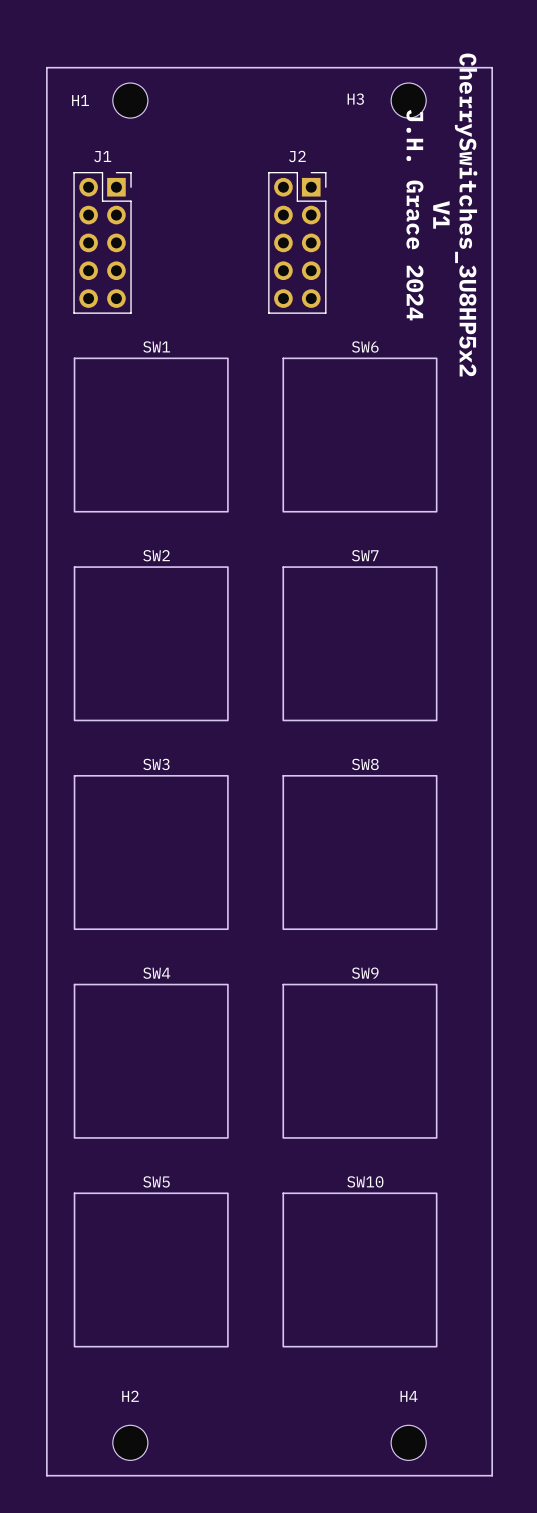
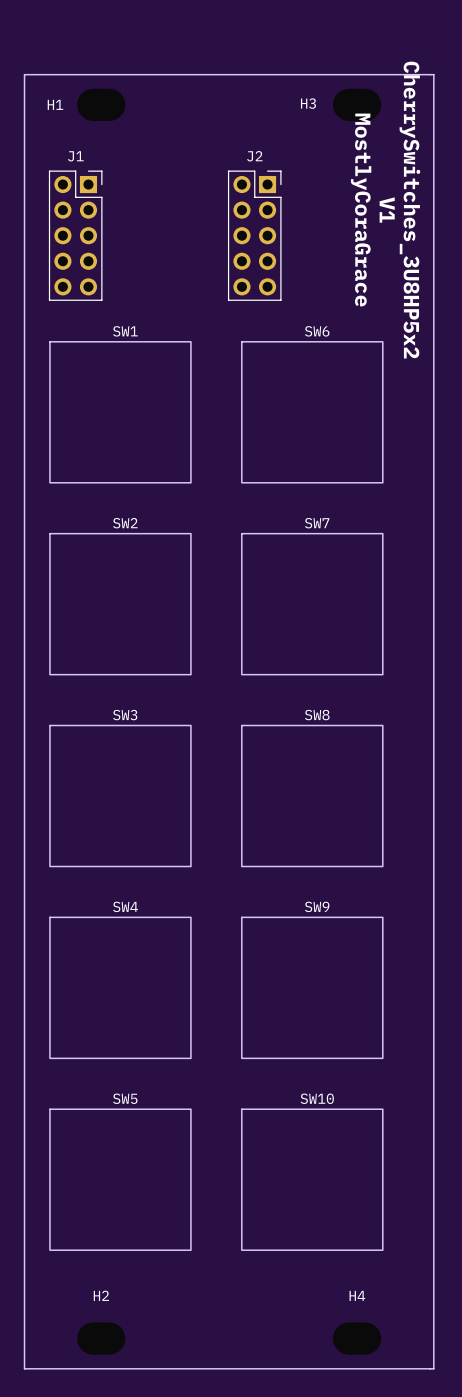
H1 footprint: [112, 83, 148, 119] -> [77, 88, 126, 121]
H3 footprint: [391, 83, 427, 119] -> [332, 88, 382, 121]
text: J.H. Grace 2024 (414, 215) -> MostlyCoraGrace (361, 210)
H2 footprint: [112, 1425, 148, 1461] -> [77, 1322, 126, 1355]
H4 footprint: [391, 1425, 427, 1461] -> [332, 1322, 382, 1355]

